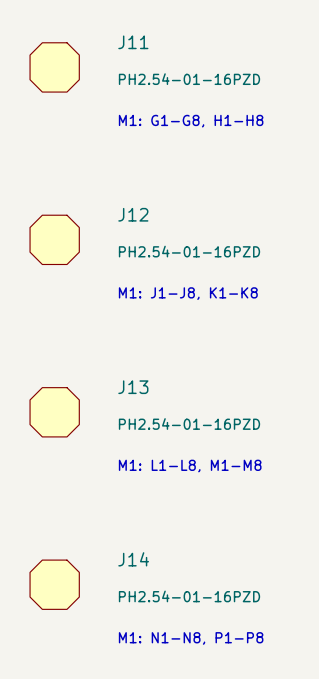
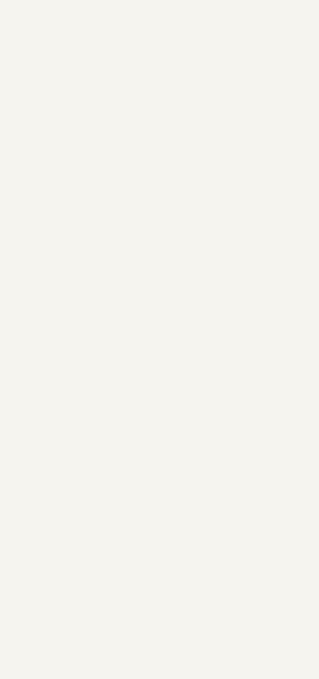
J11: PH2.54-01-16PZD (54, 67) -> none
text: M1: G1-G8, H1-H8 (191, 121) -> none
J12: PH2.54-01-16PZD (54, 239) -> none
text: M1: J1-J8, K1-K8 (188, 293) -> none
J13: PH2.54-01-16PZD (54, 412) -> none
text: M1: L1-L8, M1-M8 (190, 466) -> none
J14: PH2.54-01-16PZD (54, 584) -> none
text: M1: N1-N8, P1-P8 (191, 638) -> none

